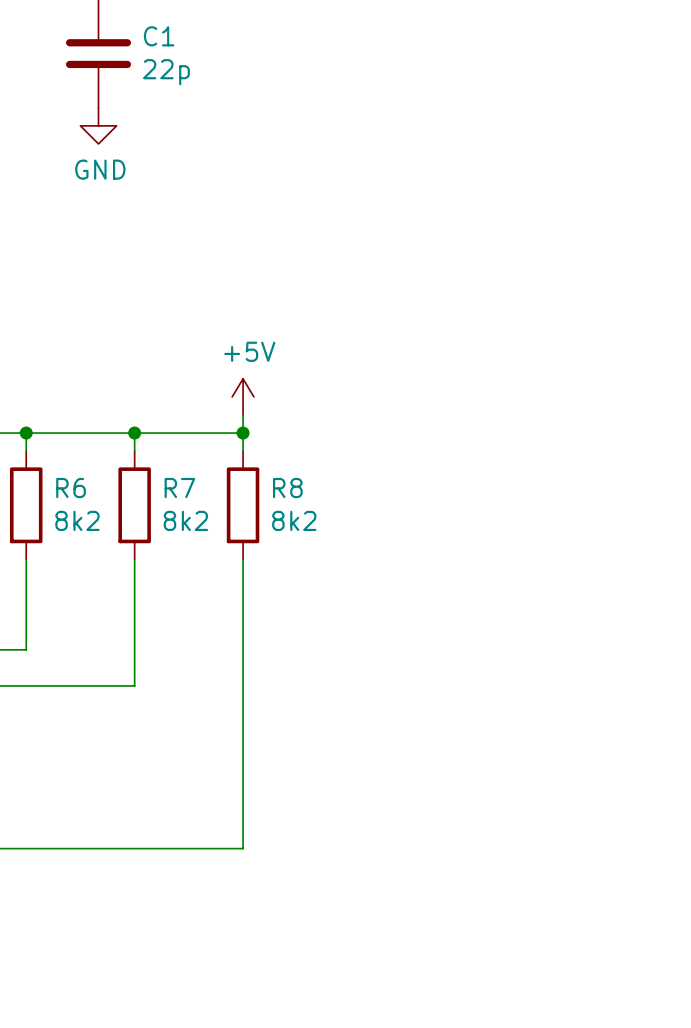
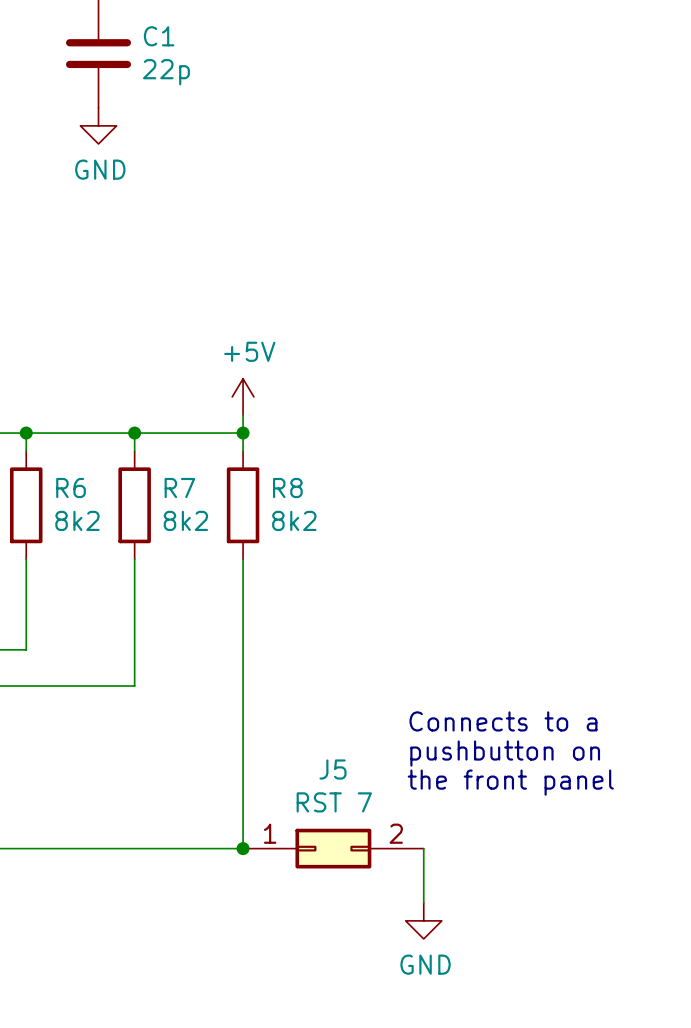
text: none -> Connects to a (503, 721)
text: none -> pushbutton on (505, 753)
text: none -> the front panel (510, 782)
junction: none -> (243, 848)
J5: none -> RST 7 (333, 848)
wire: none -> (423, 848) (423, 902)
power symbol: none -> GND (423, 920)

